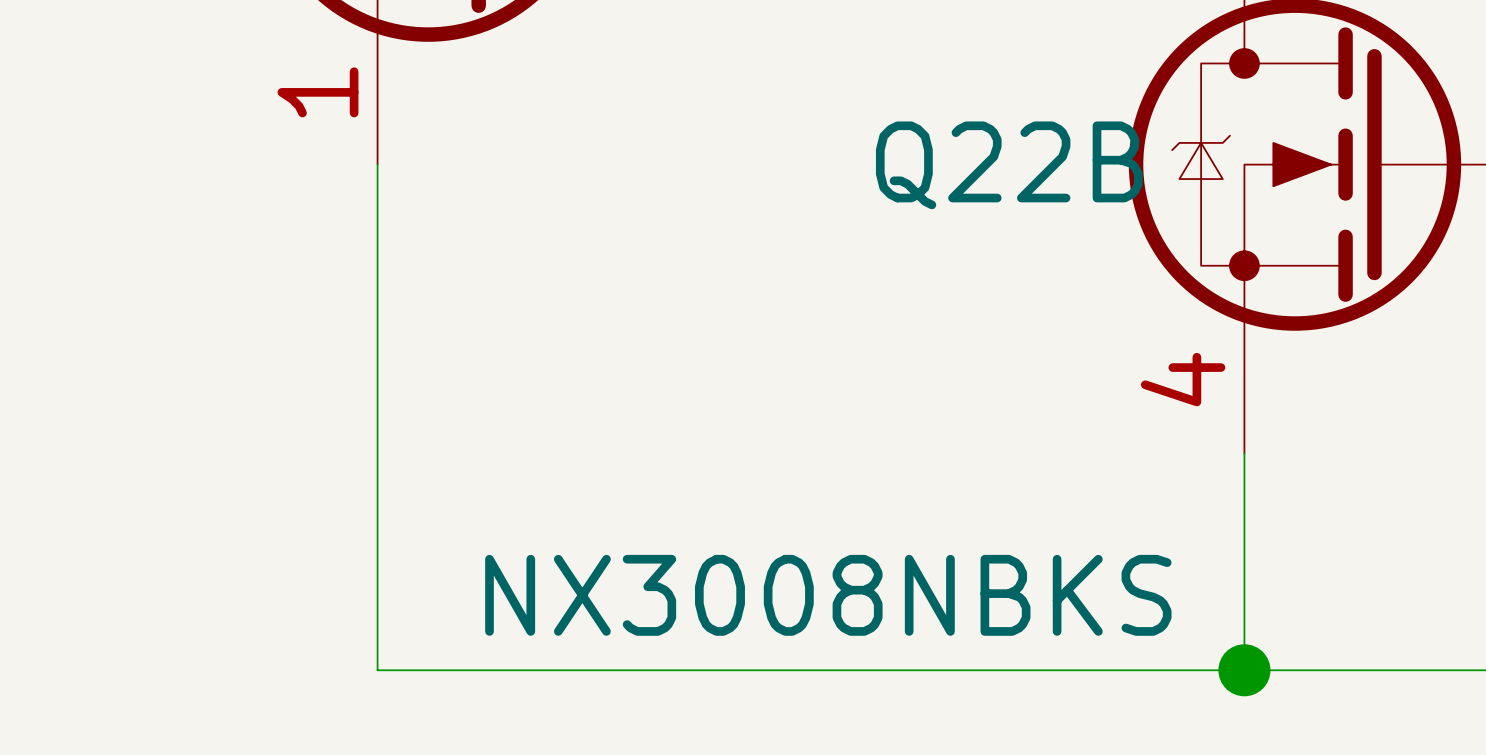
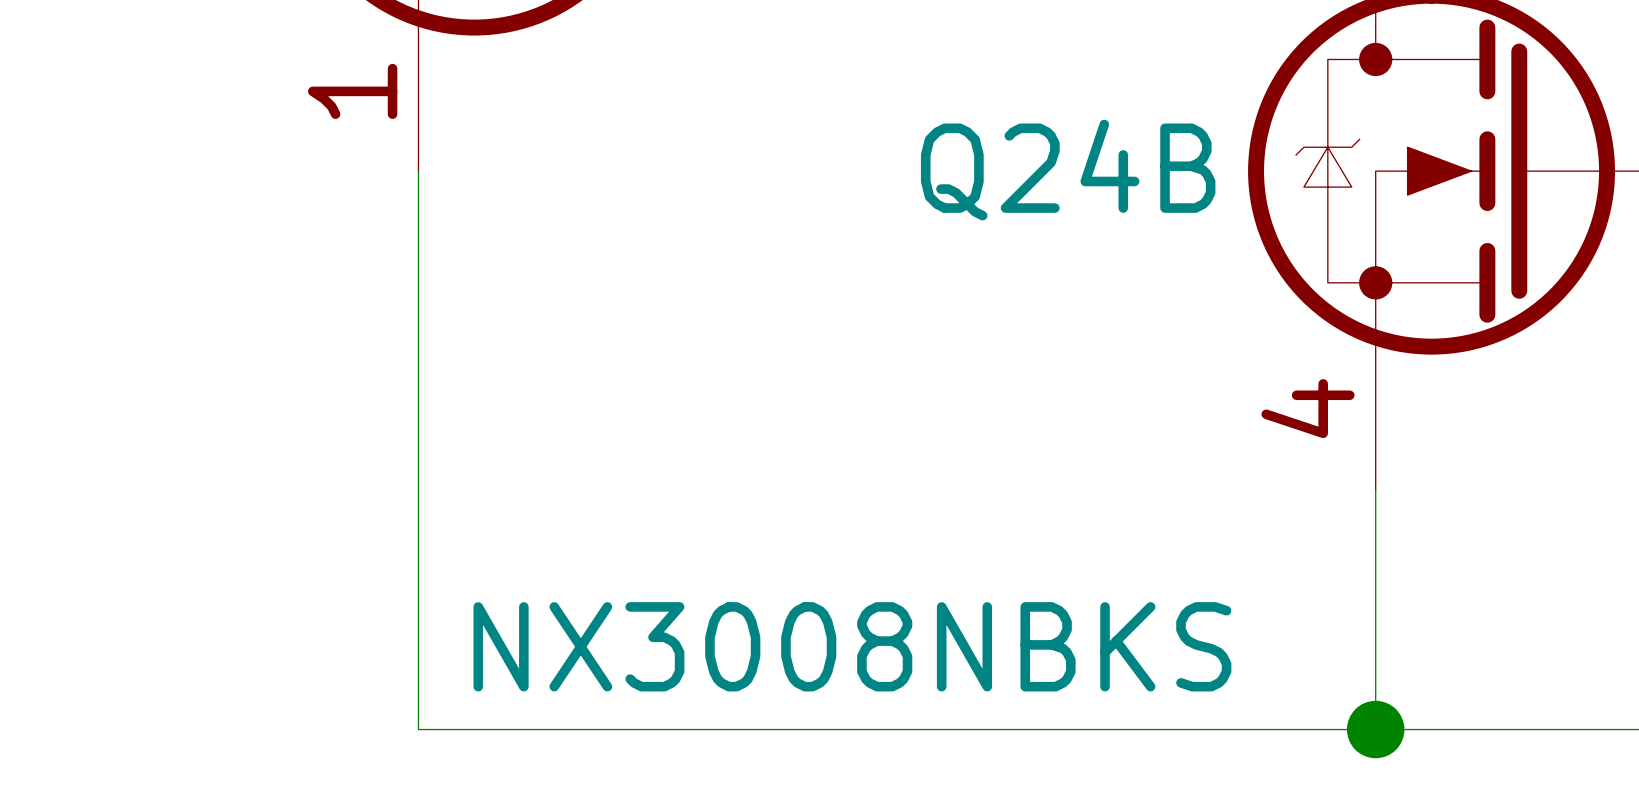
Q22B name: Q22B (1009, 165) -> Q24B (1068, 170)
part value position: NX3008NBKS (828, 595) -> NX3008NBKS (852, 646)

